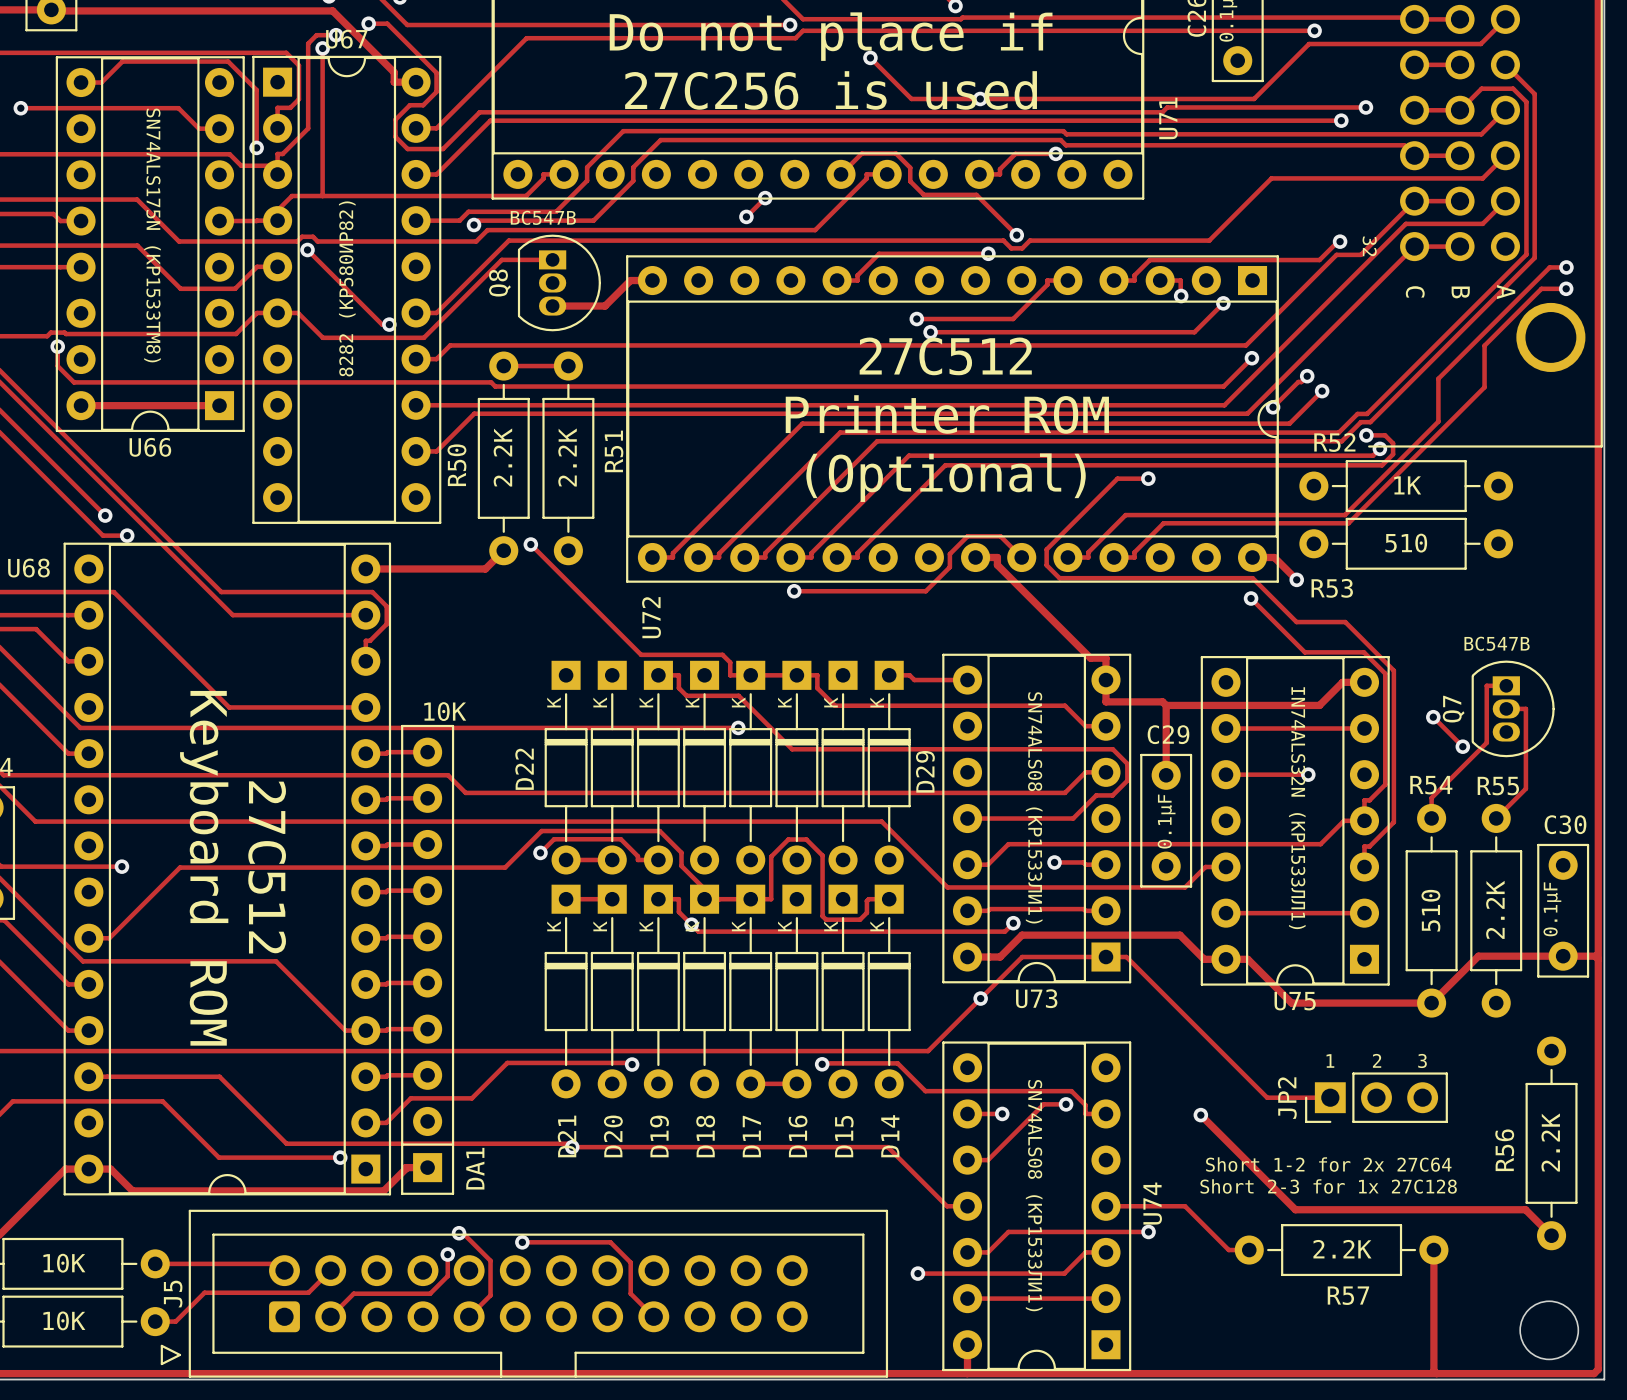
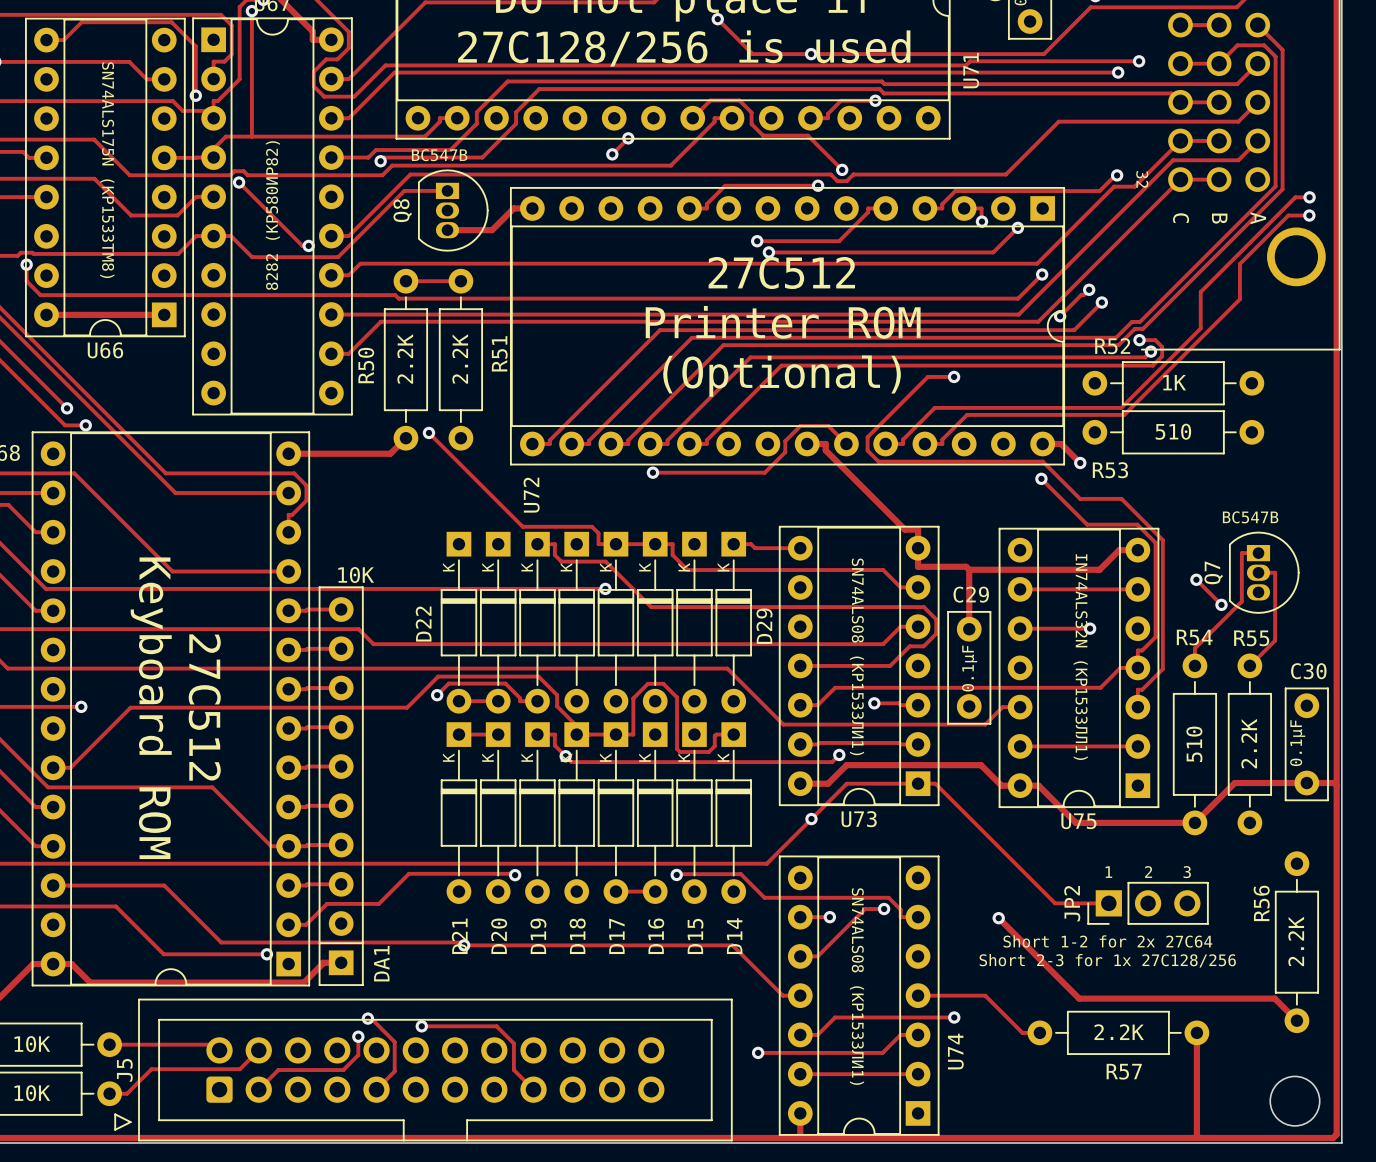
text: 27C256 is used (831, 90) -> 27C128/256 is used (684, 48)
text: none -> Short 1-2 for 2x 27C64 (1107, 941)
R56 name position: R56 (1504, 1150) -> R56 (1261, 903)
text: Short 1-2 for 2x 27C64 (1328, 1164) -> Short 2-3 for 1x 27C128/256 (1107, 960)
text: Short 2-3 for 1x 27C128 (1328, 1186) -> none
U74 name position: U74 (1152, 1203) -> U74 (955, 1051)

